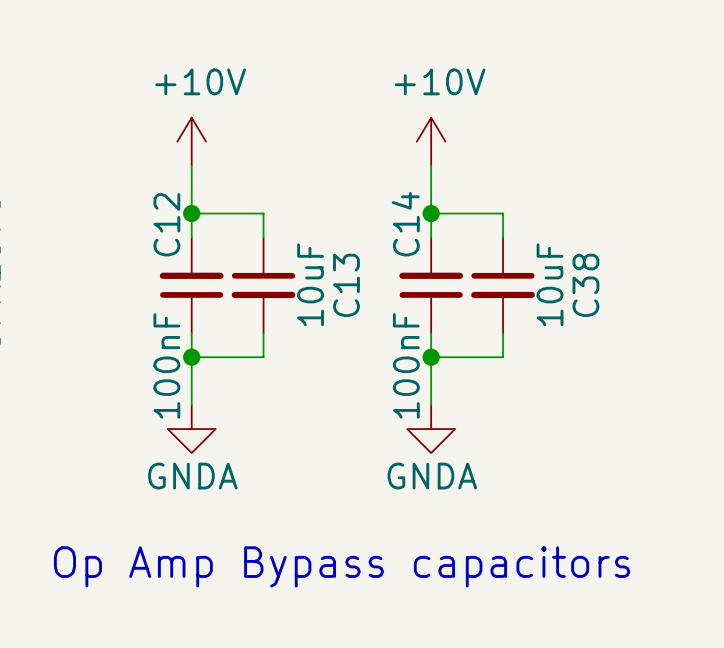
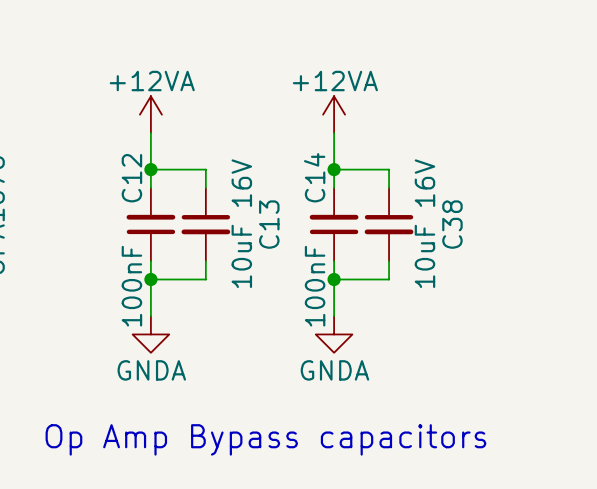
power symbol: +10V (191, 141) -> +12VA (150, 114)
power symbol: +10V (431, 141) -> +12VA (334, 114)
C13 value: 10uF (310, 284) -> 10uF 16V (241, 223)
C38 value: 10uF (550, 284) -> 10uF 16V (424, 223)

